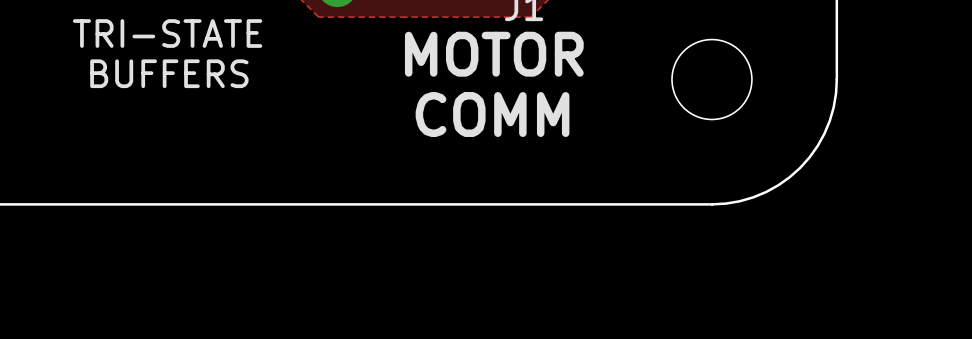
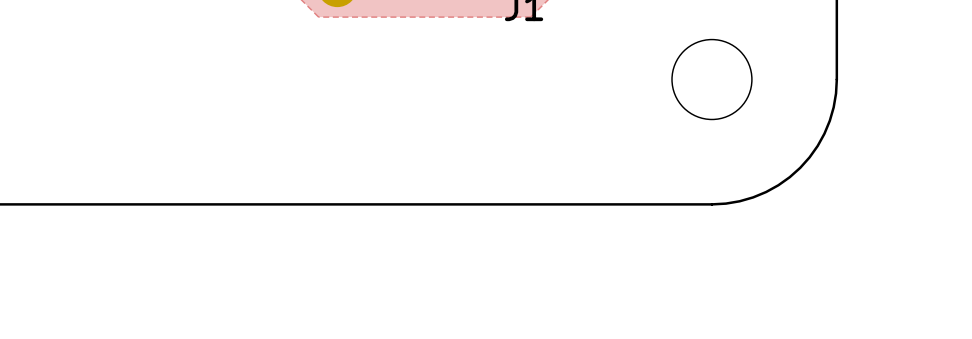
text: TRI-STATE (167, 33) -> none
text: MOTOR (494, 54) -> none
text: BUFFERS (169, 73) -> none
text: COMM (492, 114) -> none

